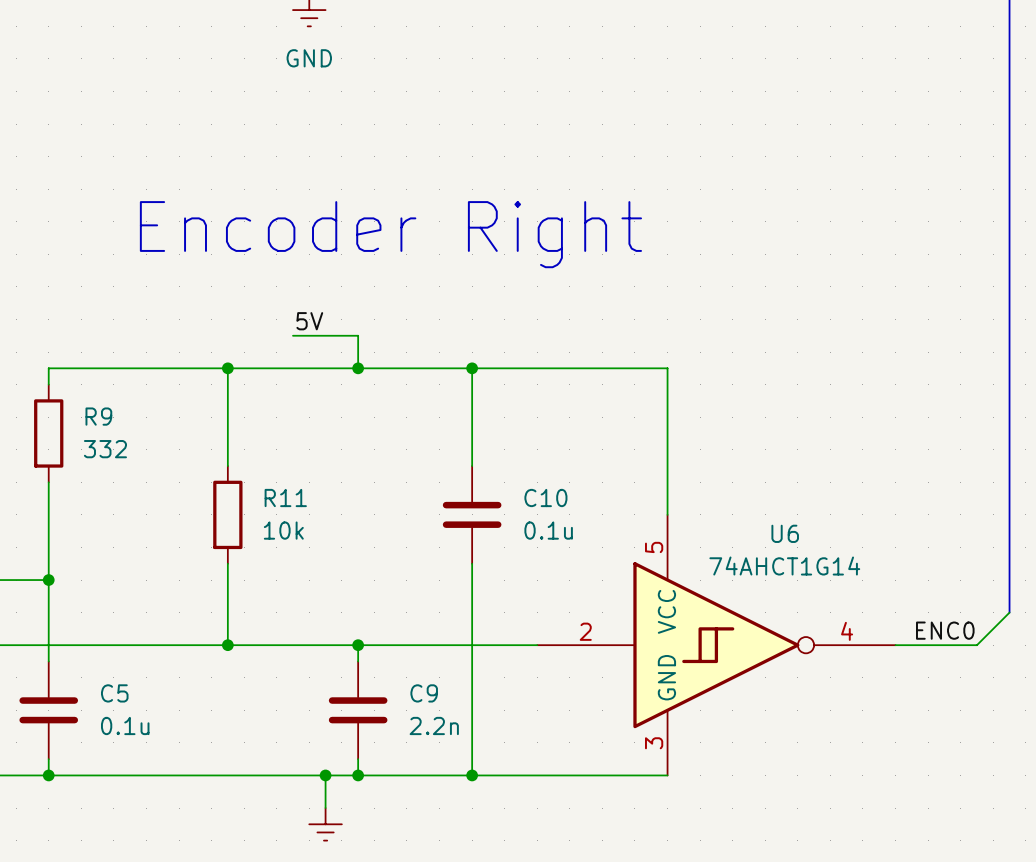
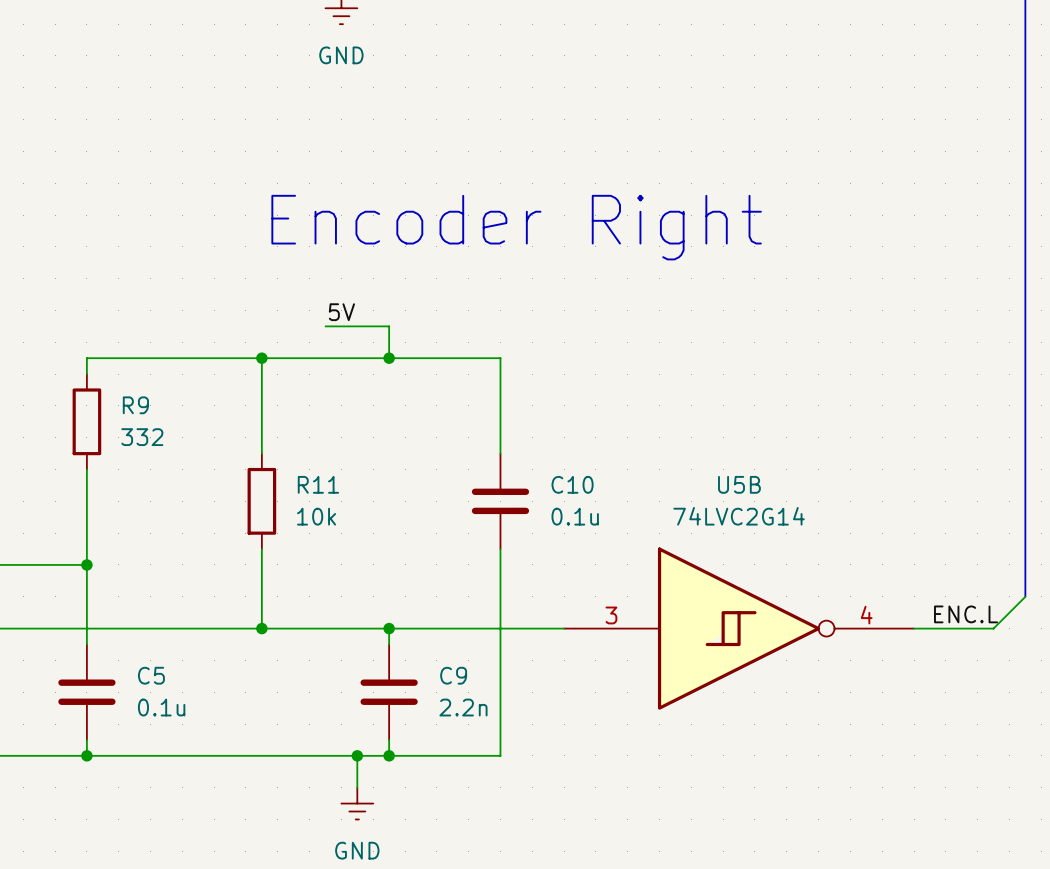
text position: Encoder Right (390, 234) -> Encoder Right (516, 227)
wire: (472, 368) (667, 368) (667, 514) -> none
junction: (472, 368) -> none
label: ENC0 (945, 630) -> ENC.L (966, 614)
U6: 74AHCT1G14 (716, 645) -> none
U5B: none -> 74LVC2G14 (739, 628)
wire: (472, 775) (667, 775) -> none
junction: (472, 775) -> none

